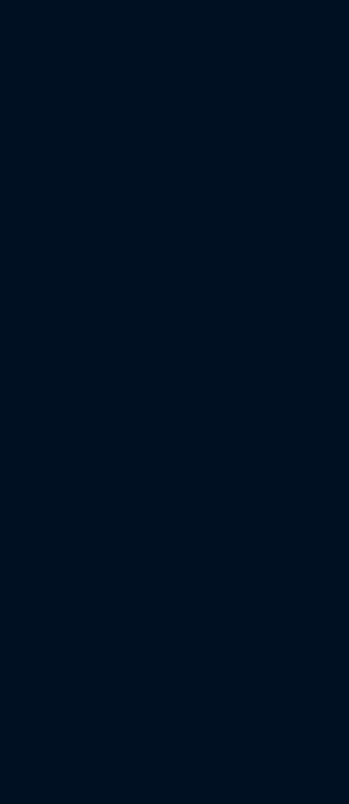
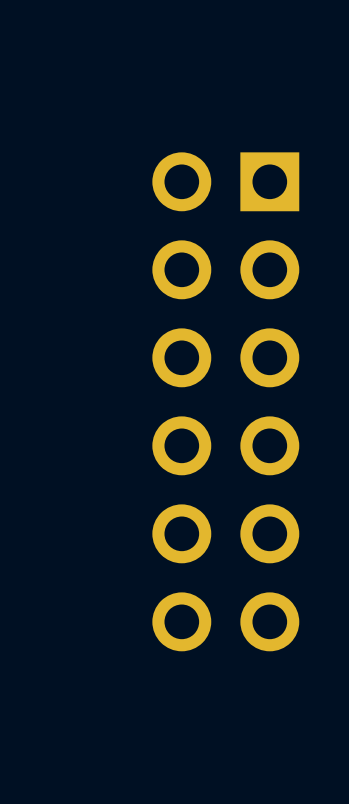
part: none -> (225, 401)

